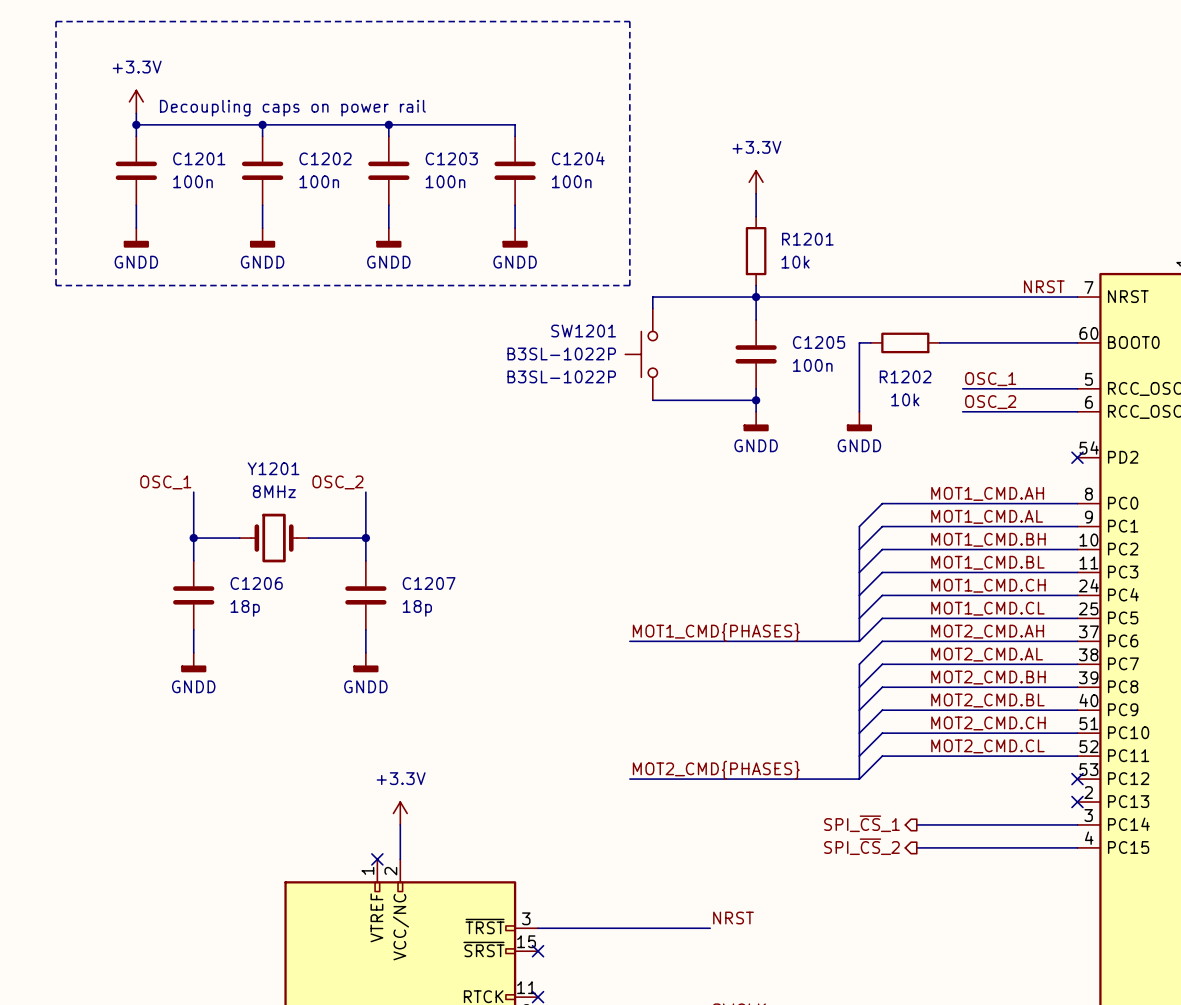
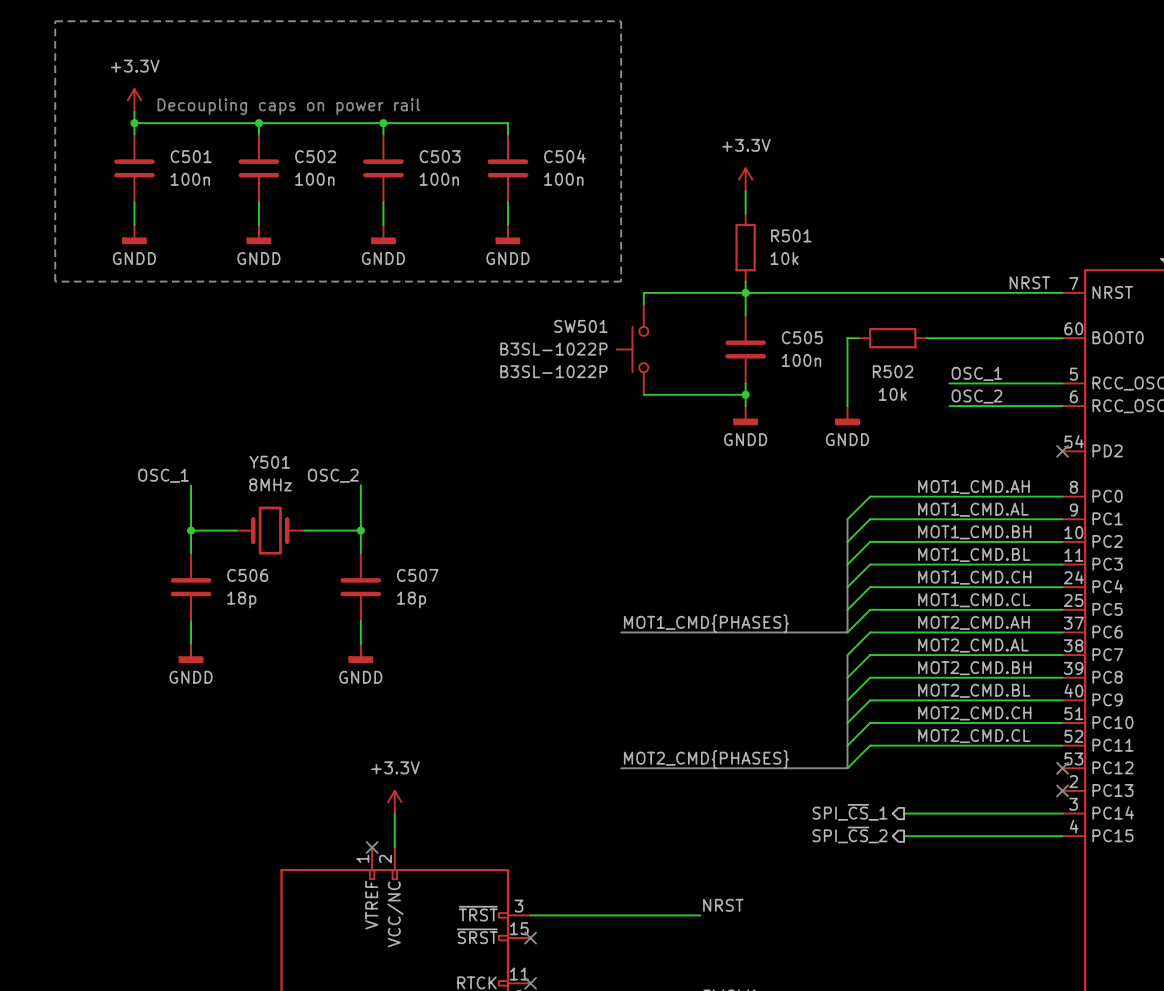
C1201 name: C1201 (199, 158) -> C501 (191, 156)
C1202 name: C1202 (325, 158) -> C502 (315, 156)
C1203 name: C1203 (451, 158) -> C503 (440, 156)
C1204 name: C1204 (578, 158) -> C504 (564, 156)
R1201 name: R1201 (807, 239) -> R501 (791, 235)
SW1201 name: SW1201 (583, 331) -> SW501 (580, 326)
C1205 name: C1205 (819, 342) -> C505 (802, 337)
R1202 name: R1202 (905, 376) -> R502 (893, 371)
Y1201 name: Y1201 (273, 468) -> Y501 (269, 462)
C1206 name: C1206 (256, 583) -> C506 (247, 575)
C1207 name: C1207 (429, 583) -> C507 (417, 575)

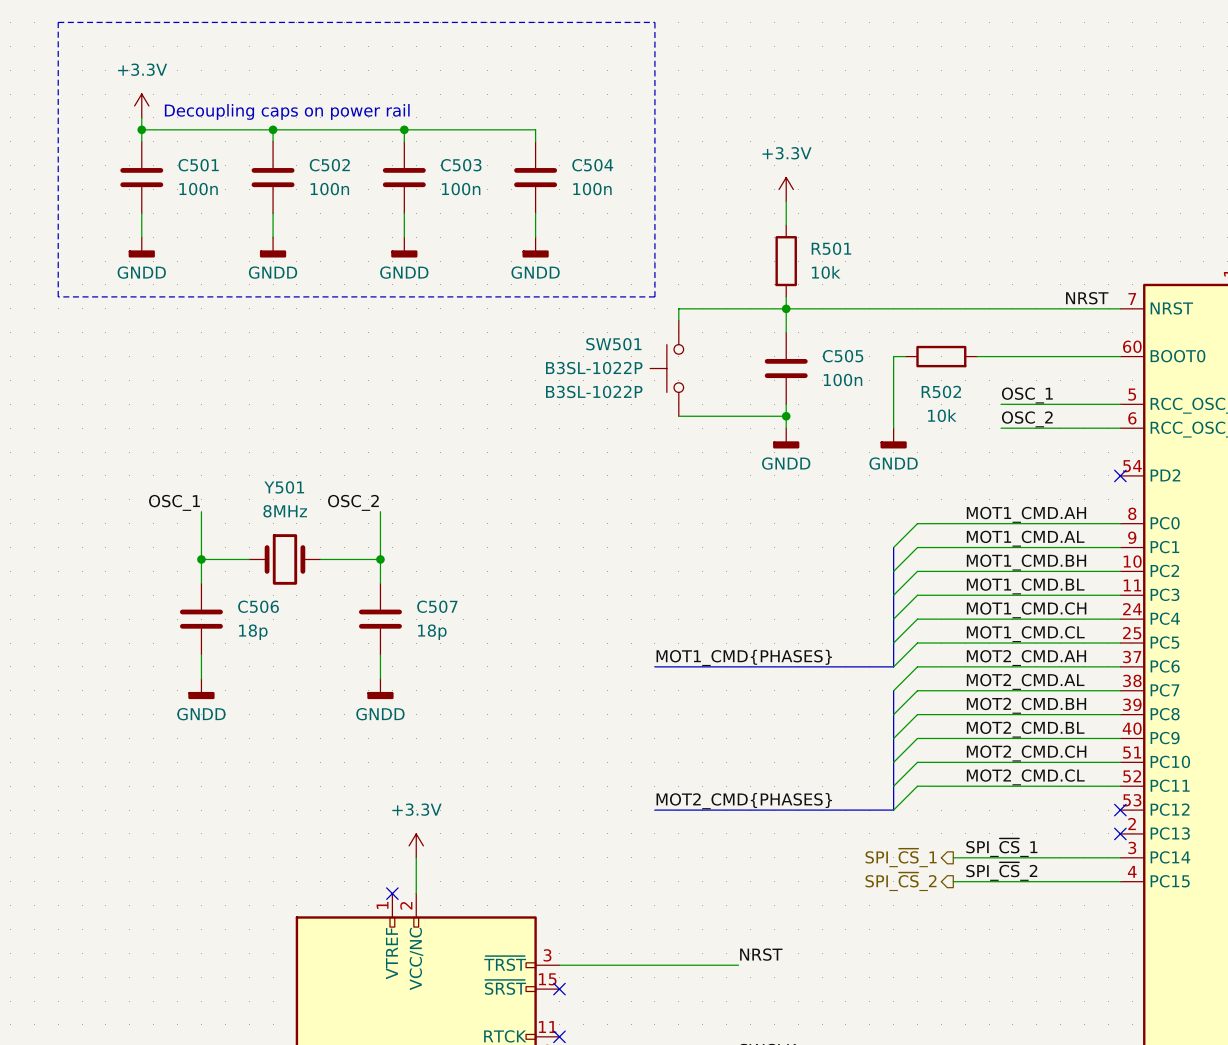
label: none -> SPI_~{CS}_1 (1001, 847)
label: none -> SPI_~{CS}_2 (1001, 871)

